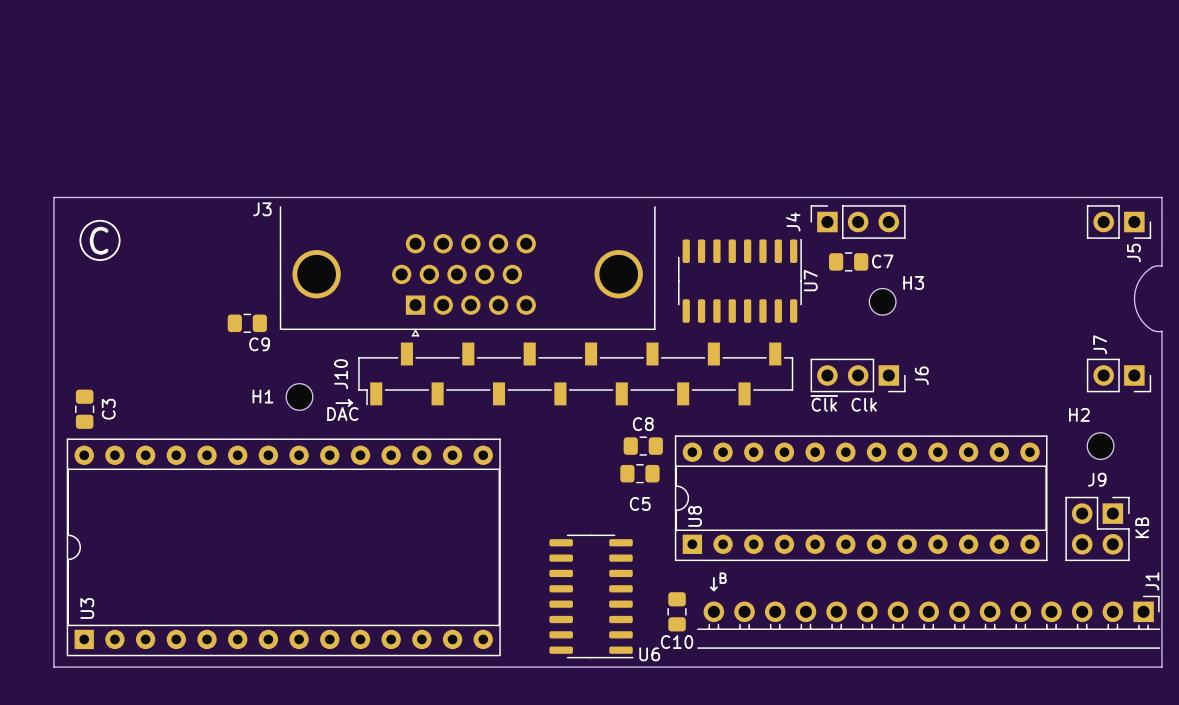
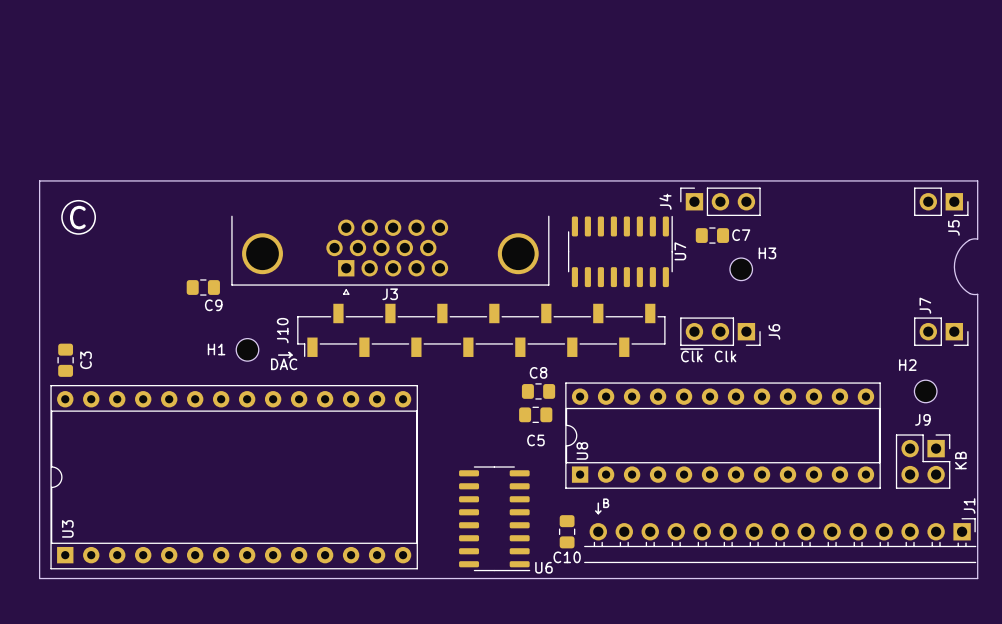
J3 footprint: [279, 206, 656, 337] -> [231, 215, 550, 295]
J3 name position: J3 (262, 209) -> J3 (390, 294)

